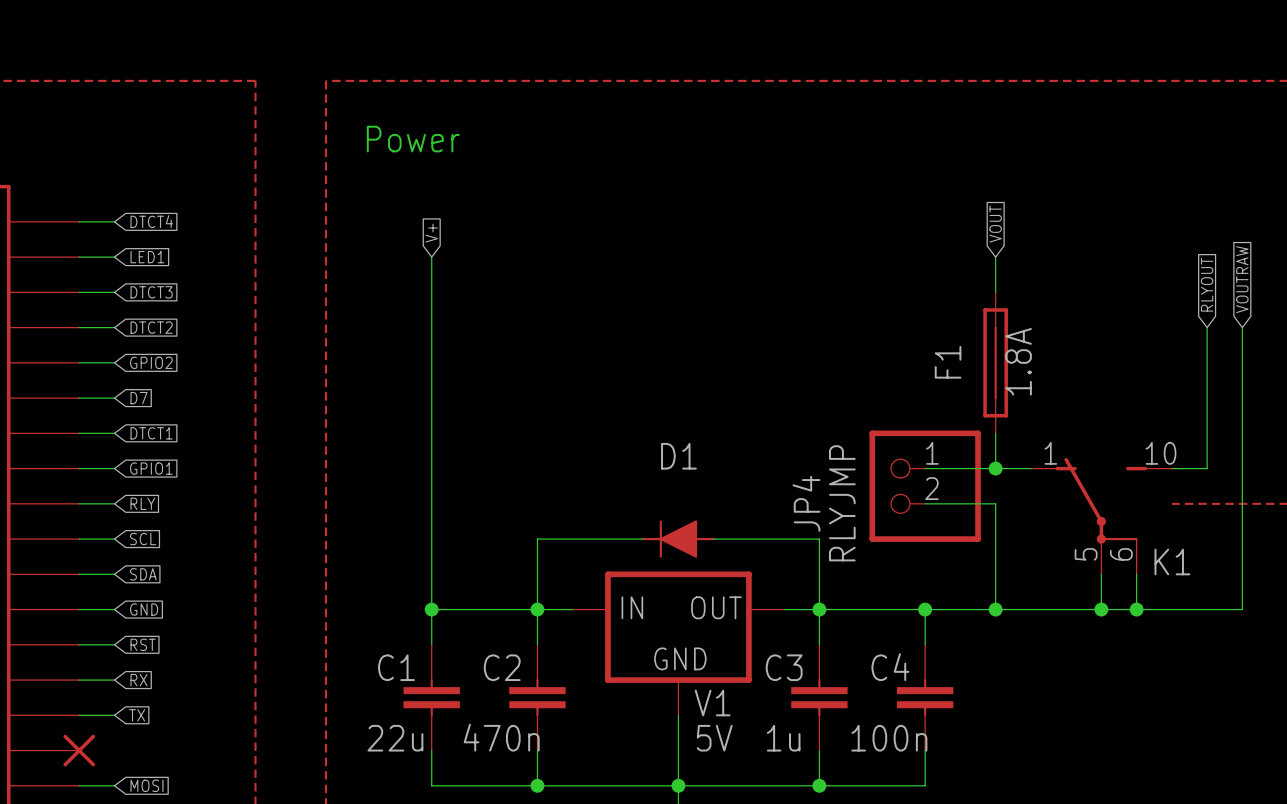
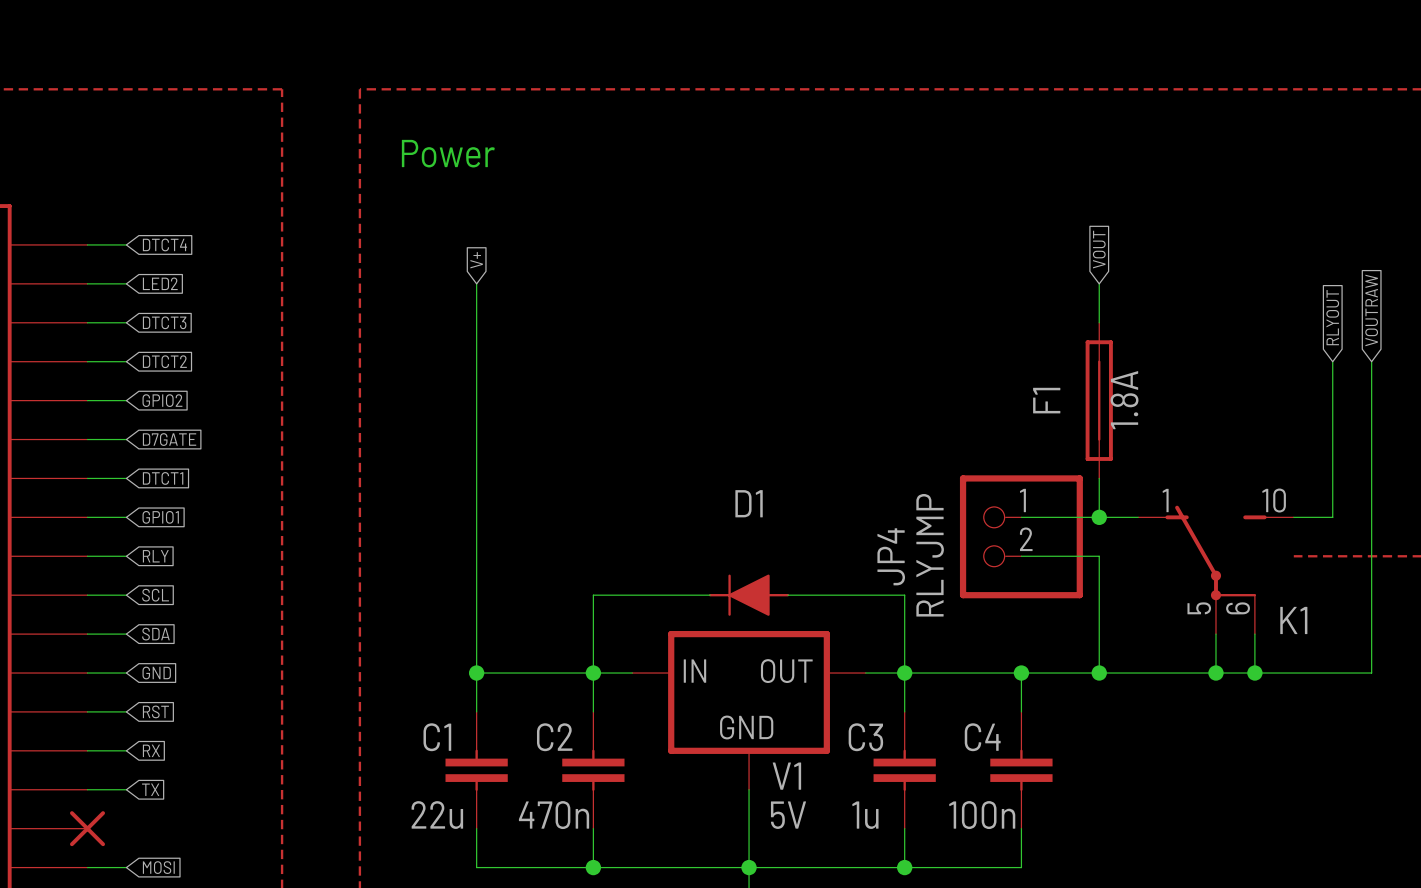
global label: LED1 (147, 257) -> LED2 (160, 283)
global label: D7 (139, 398) -> D7GATE (169, 439)

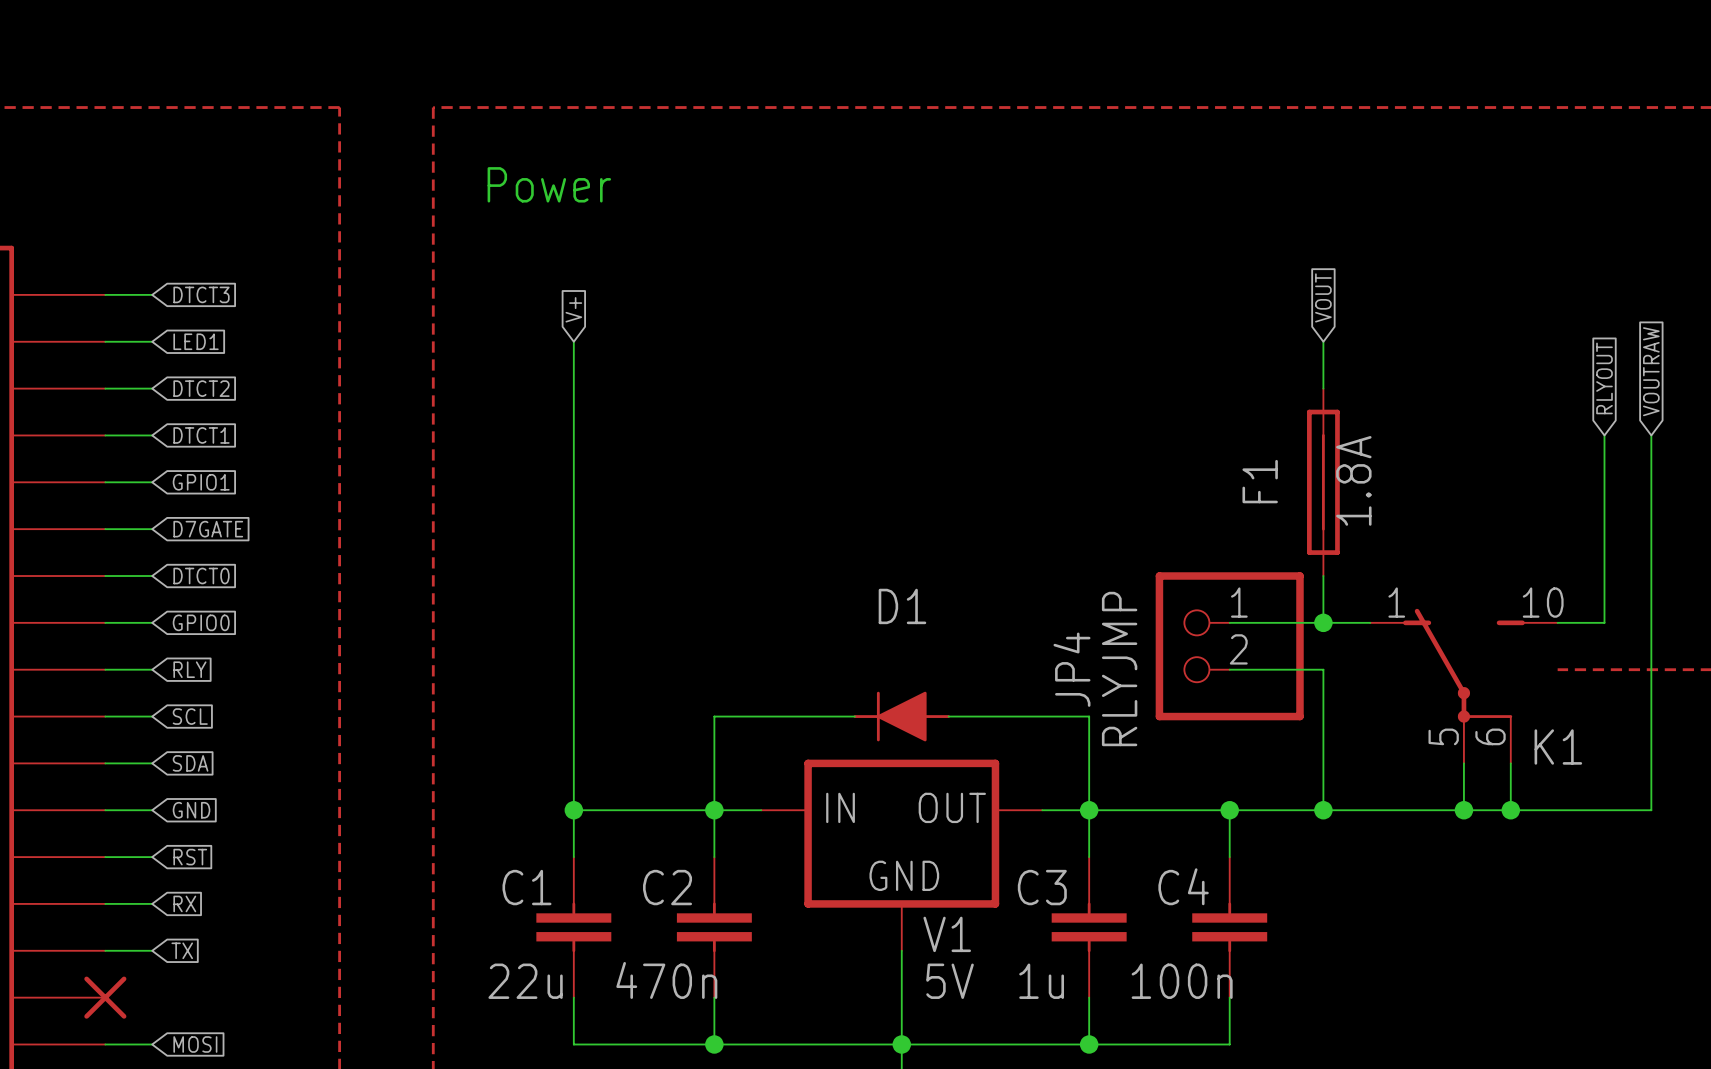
global label: DTCT4 (164, 244) -> DTCT3 (201, 294)
global label: LED2 (160, 283) -> LED1 (196, 341)
global label: DTCT3 (164, 322) -> DTCT2 (201, 388)
global label: DTCT2 (164, 361) -> DTCT1 (201, 435)
global label: GPIO2 (162, 400) -> GPIO1 (201, 482)
global label: DTCT1 (163, 478) -> DTCT0 (201, 576)
global label: GPIO1 (160, 517) -> GPIO0 (201, 622)

